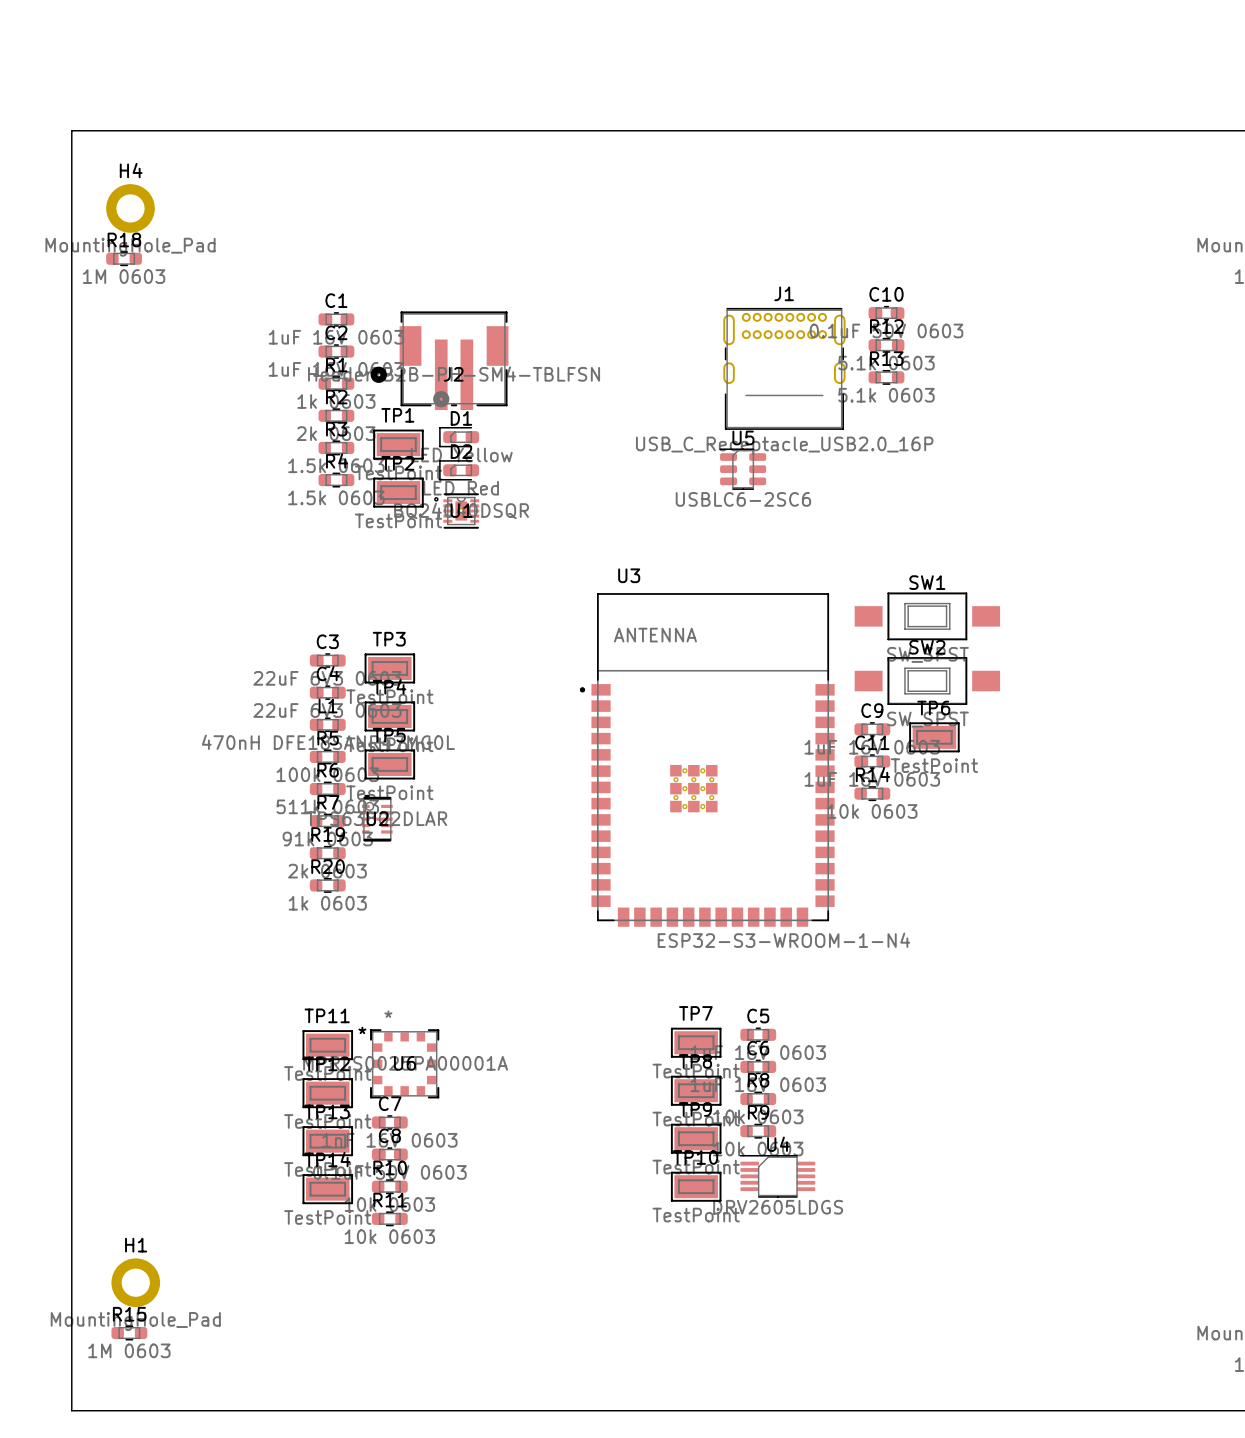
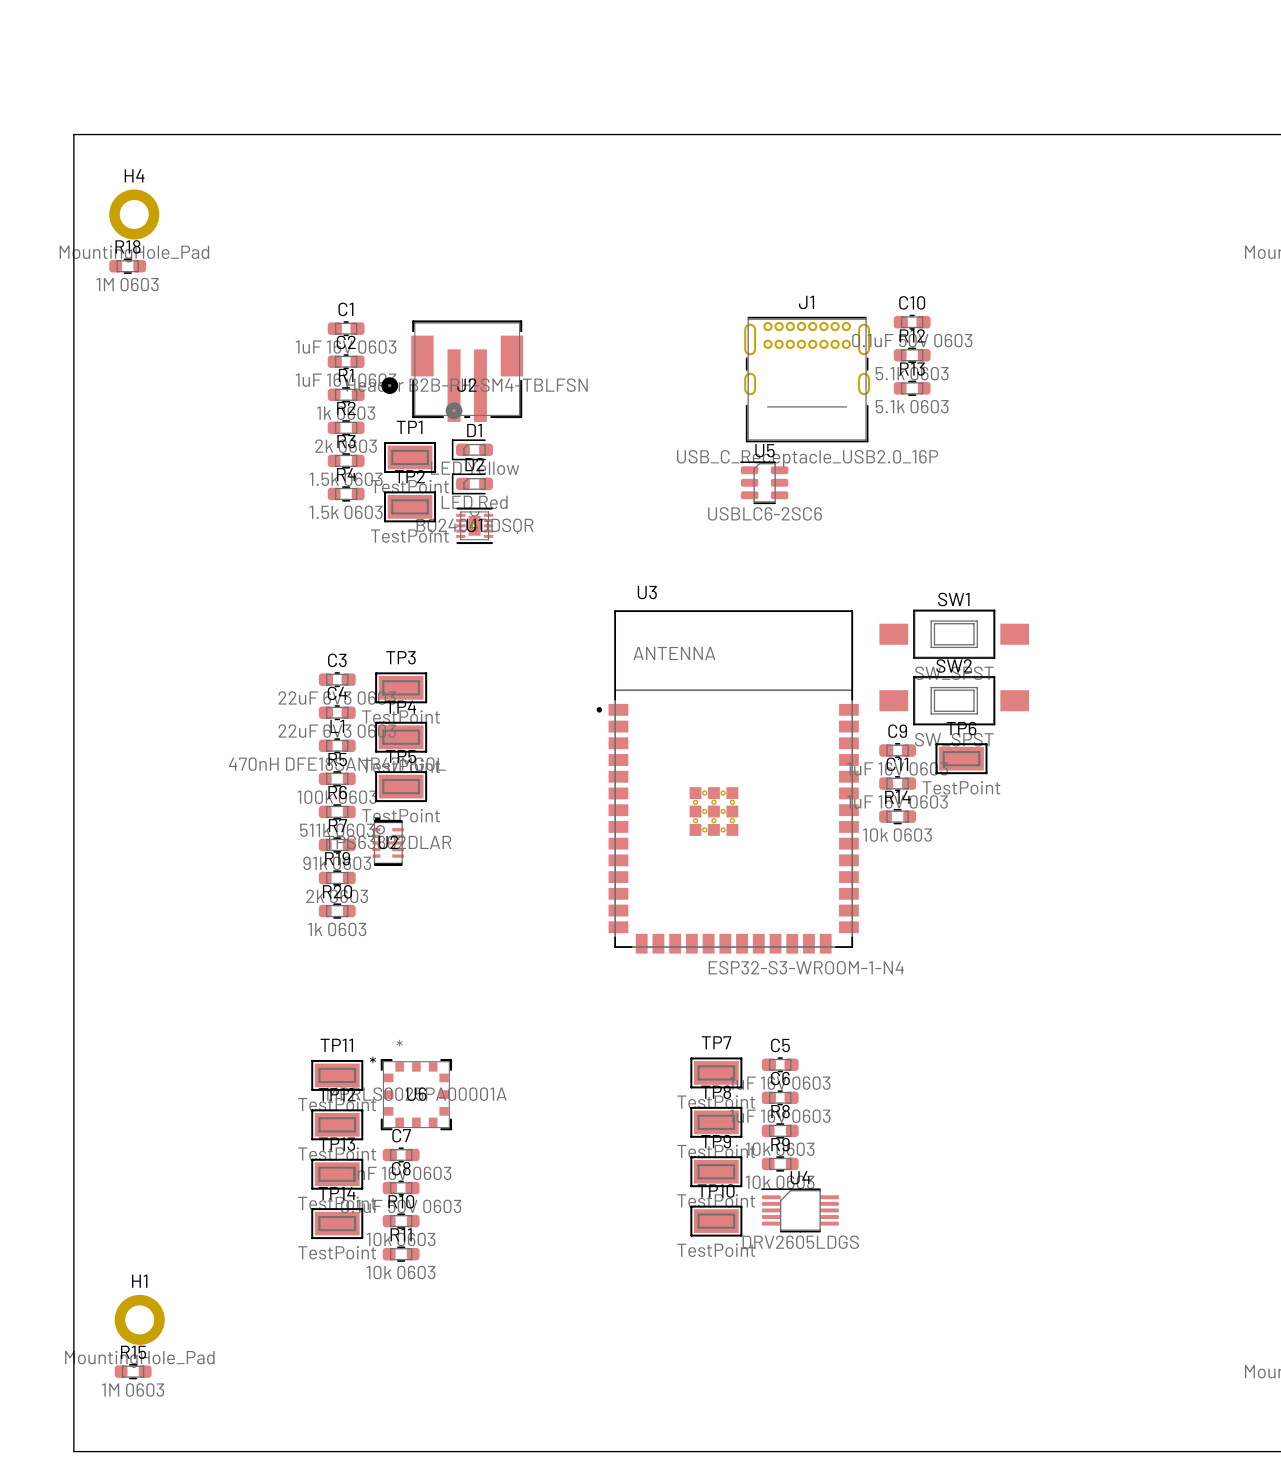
U1 footprint: [434, 493, 480, 529] -> [456, 507, 494, 545]

